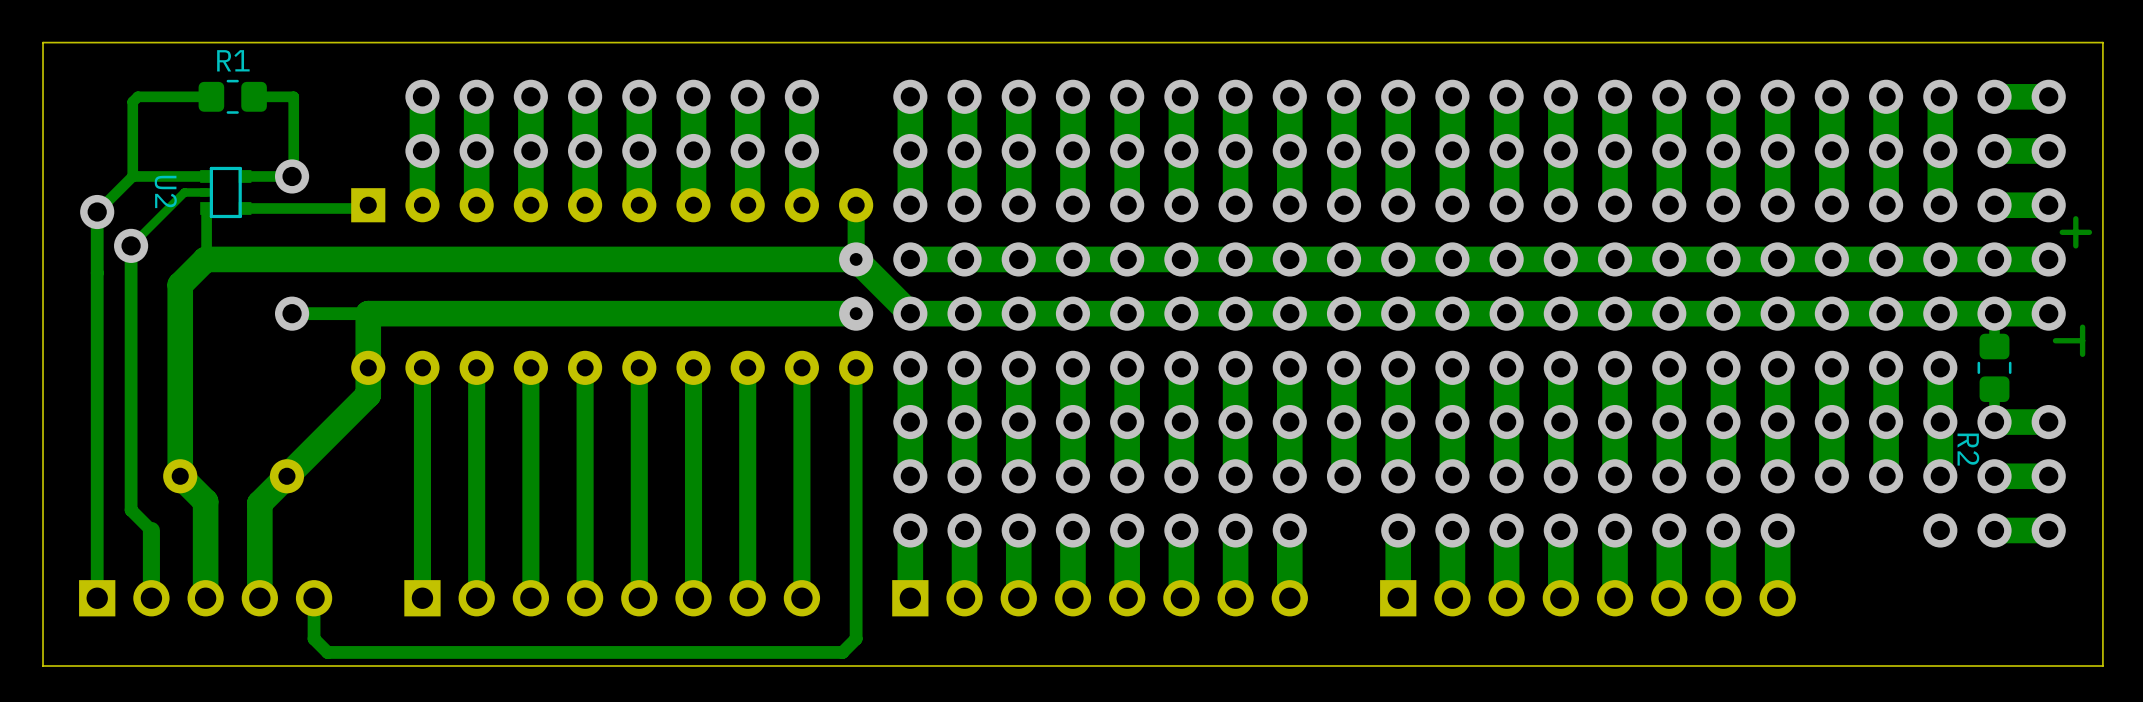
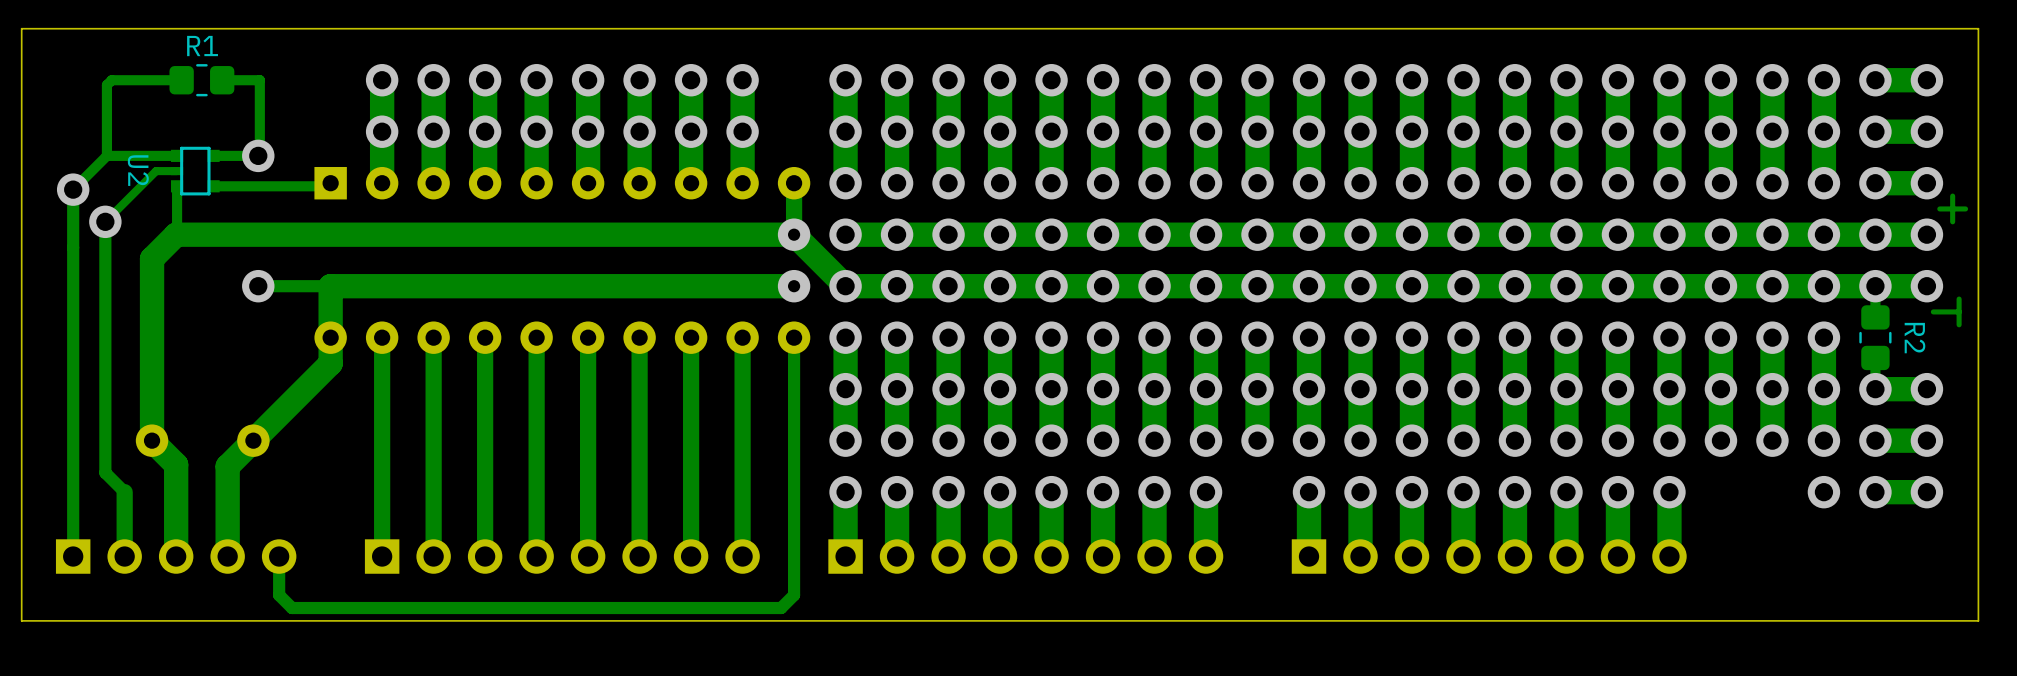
R2 name position: R2 (1968, 449) -> R2 (1914, 338)

